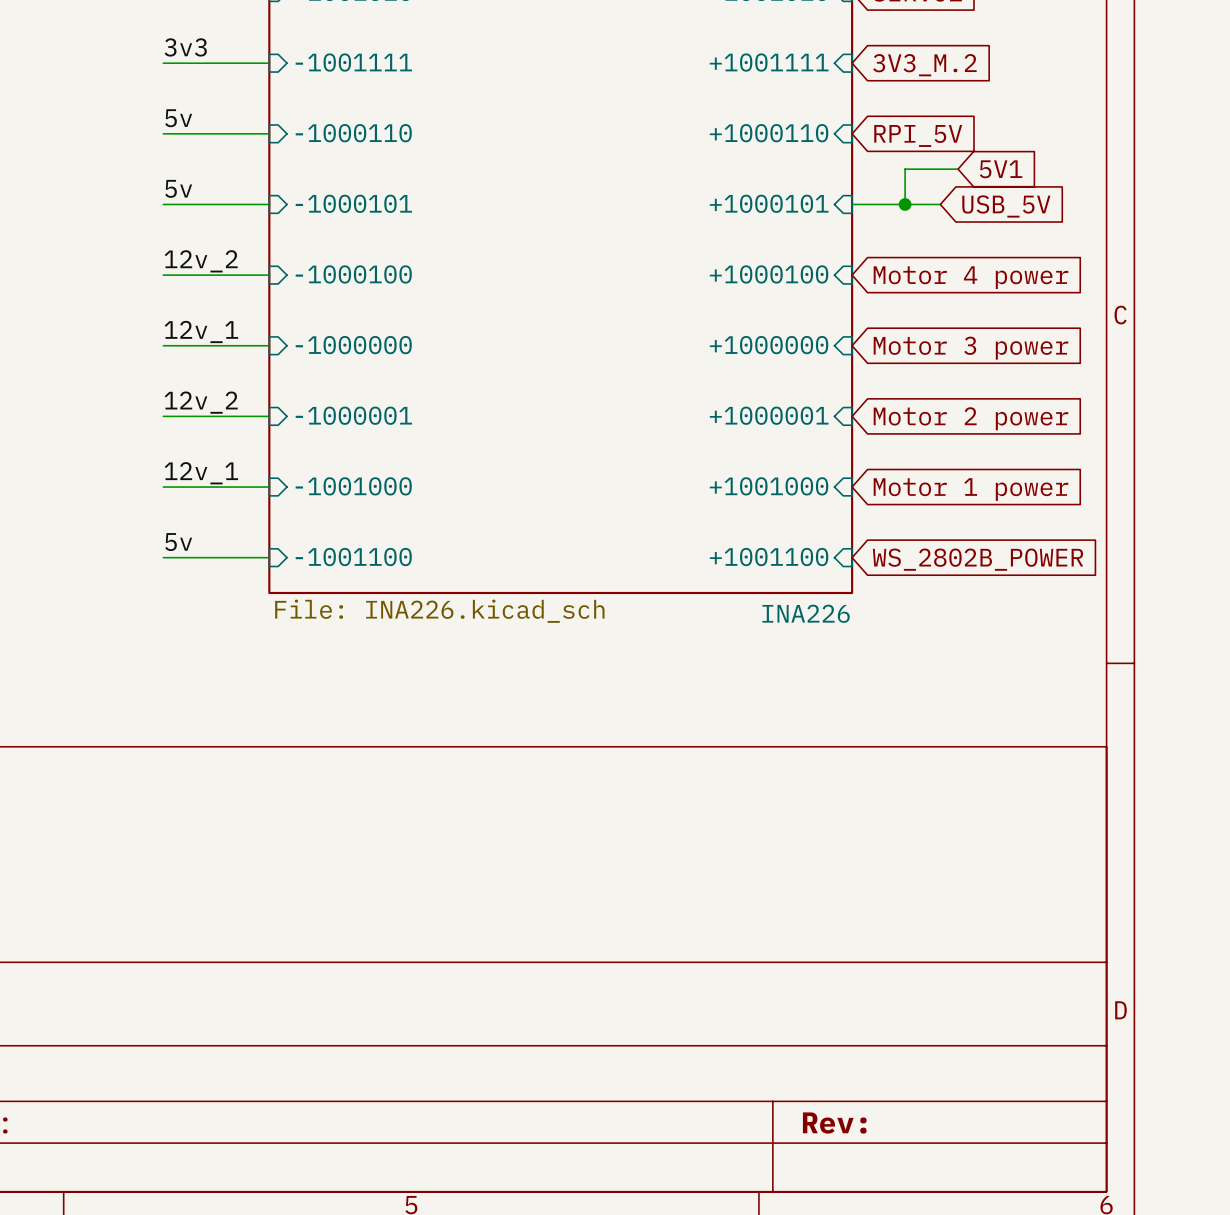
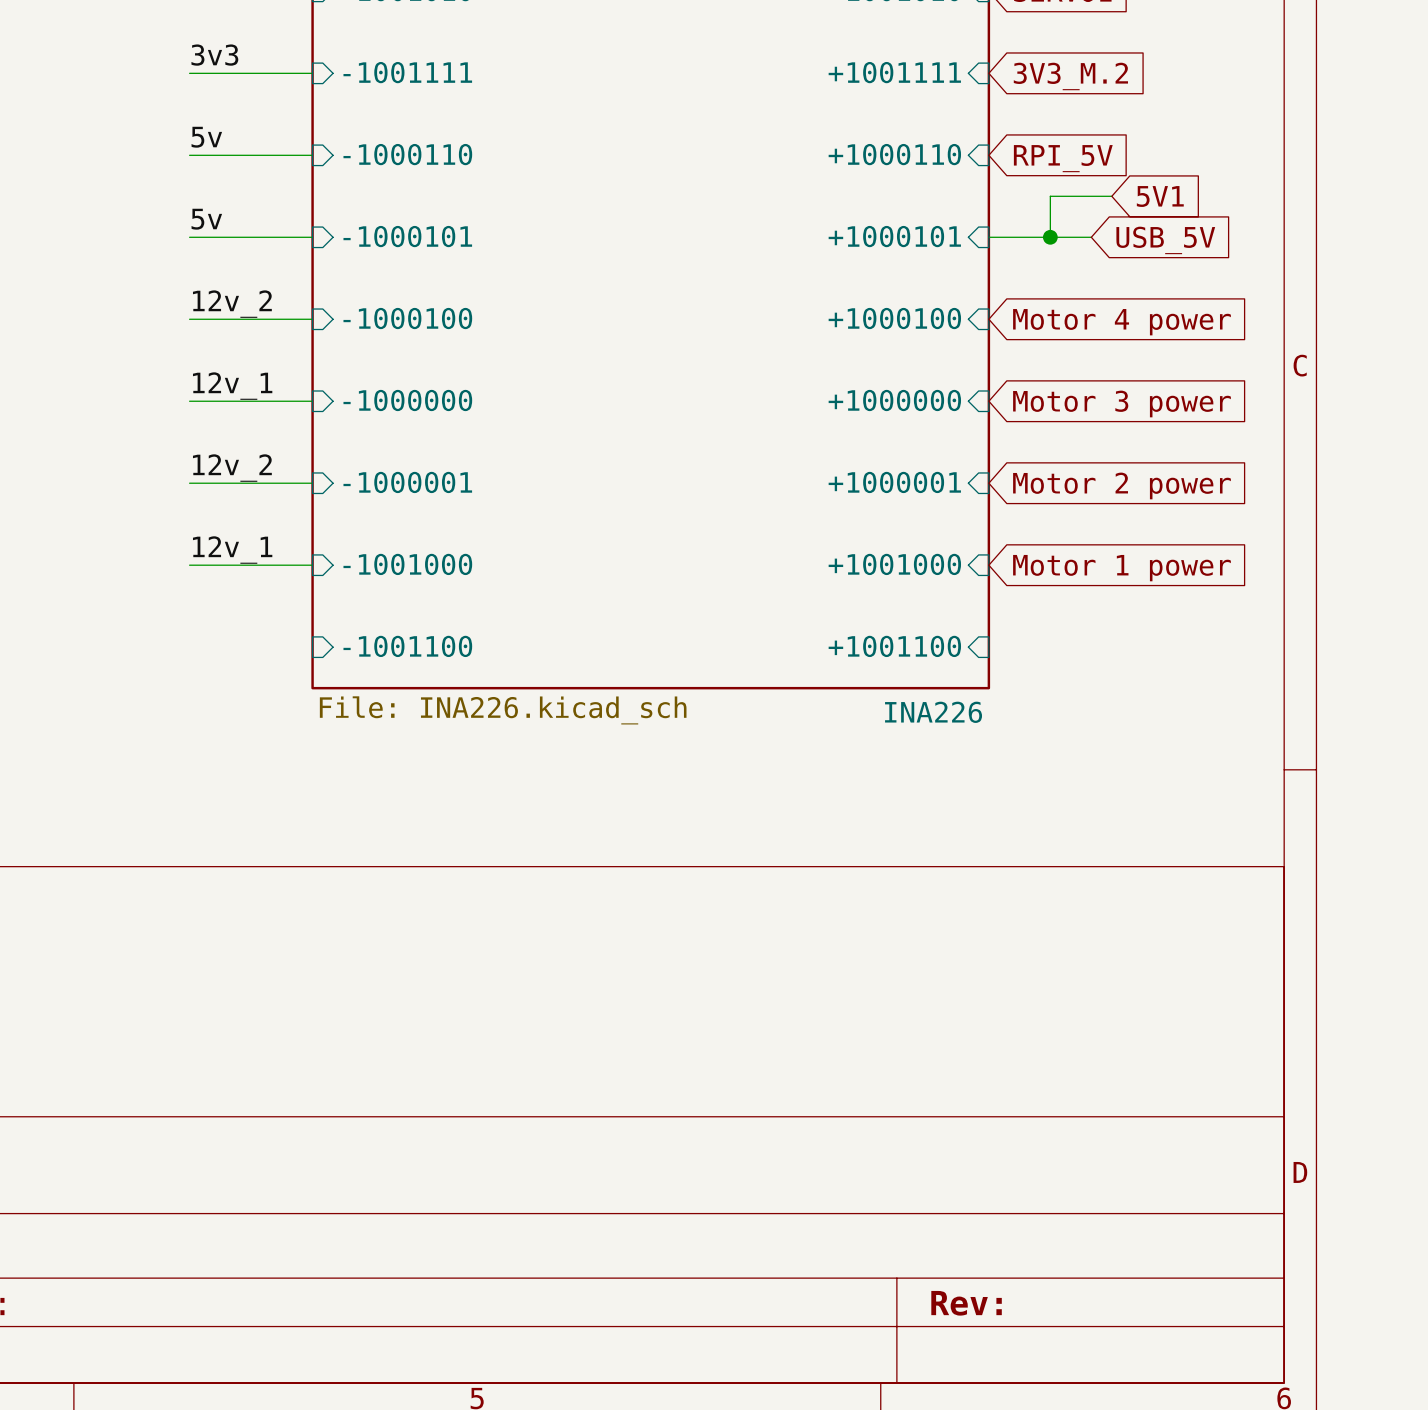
label: 5v (178, 542) -> none
wire: (163, 557) (269, 557) -> none
global label: WS_2802B_POWER (978, 559) -> none

